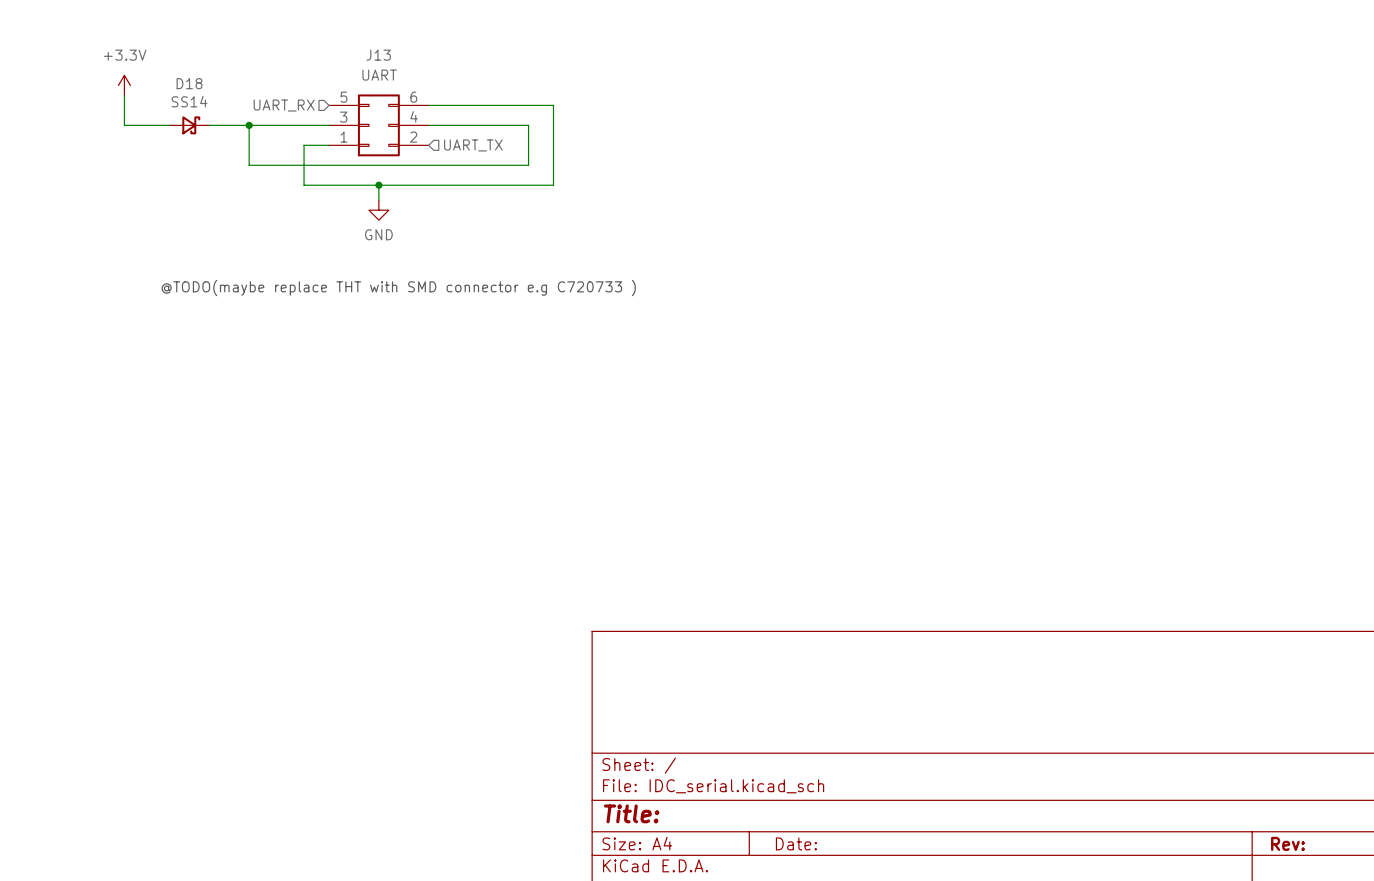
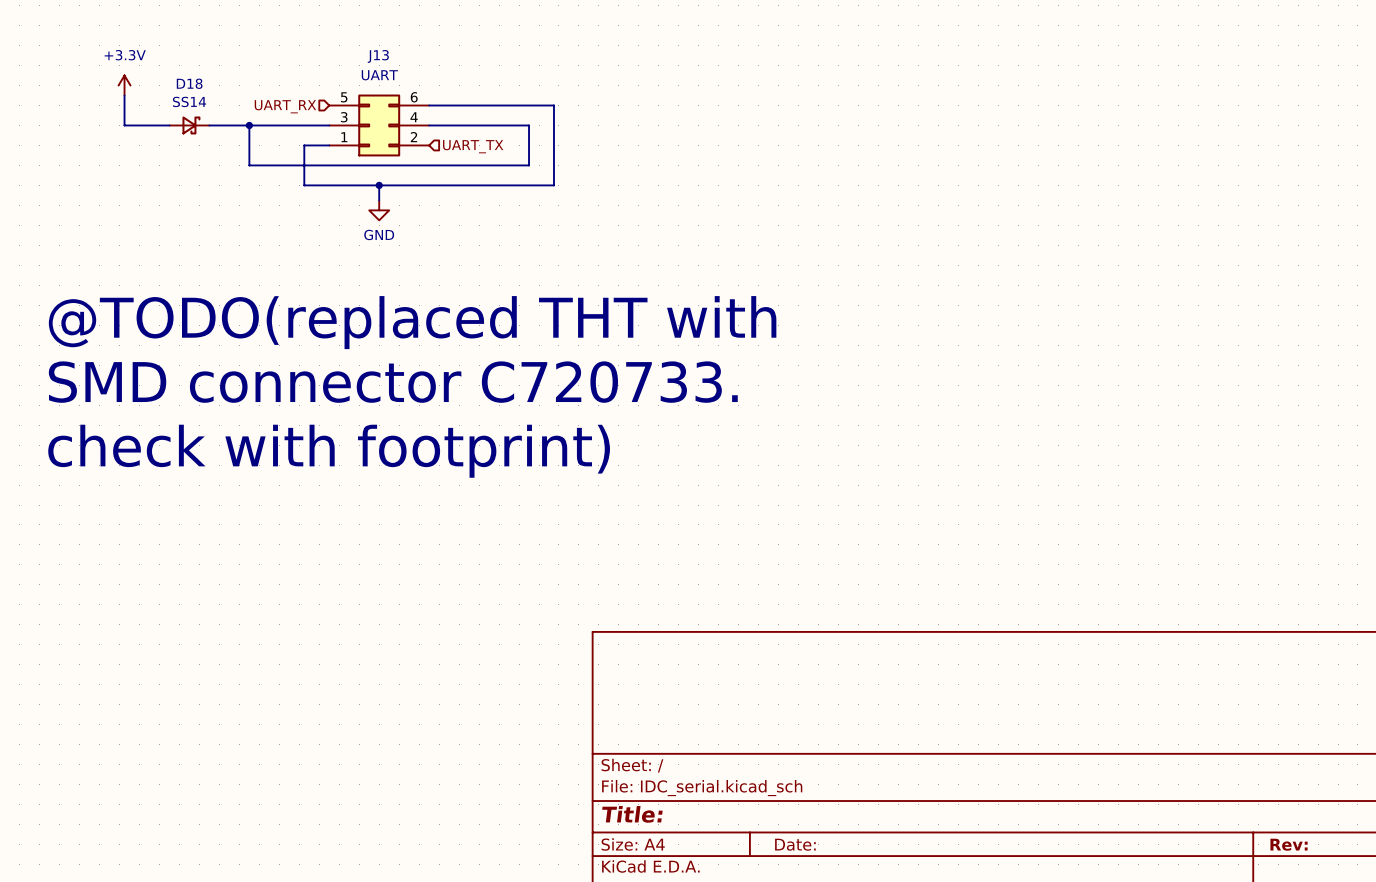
text: @TODO(maybe replace THT with SMD connector e.g C720733 ) (398, 288) -> none
text: none -> @TODO(replaced THT with (412, 322)
text: none -> SMD connector C720733. (393, 382)
text: none -> check with footprint) (329, 451)

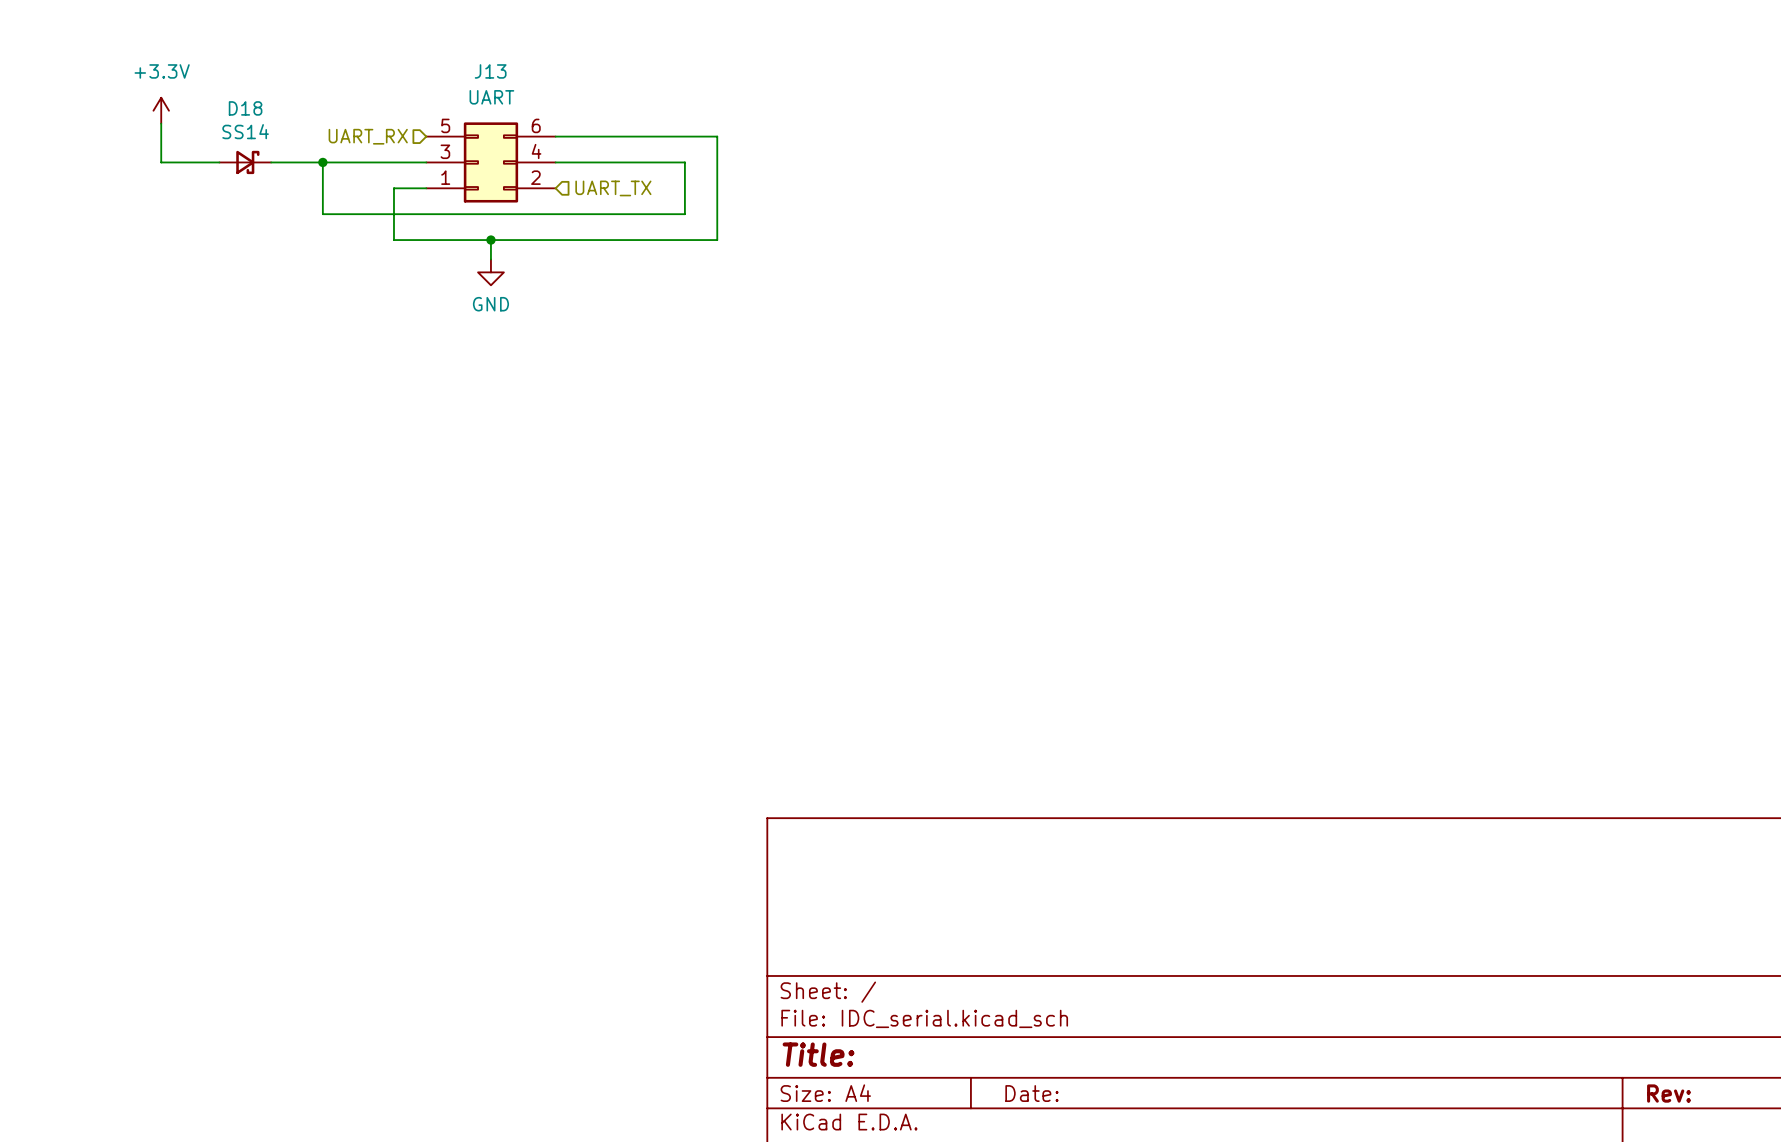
text: @TODO(replaced THT with (412, 322) -> none
text: SMD connector C720733. (393, 382) -> none
text: check with footprint) (329, 451) -> none

